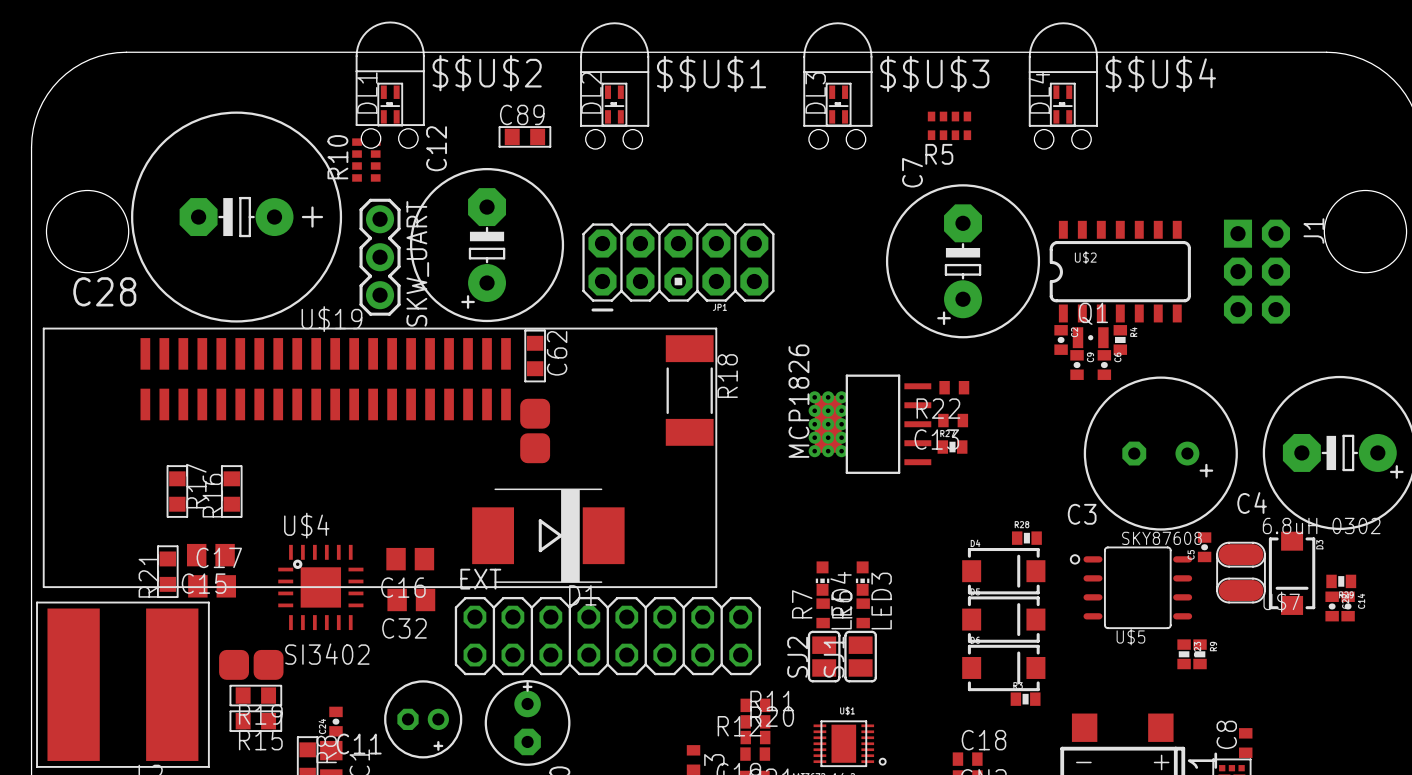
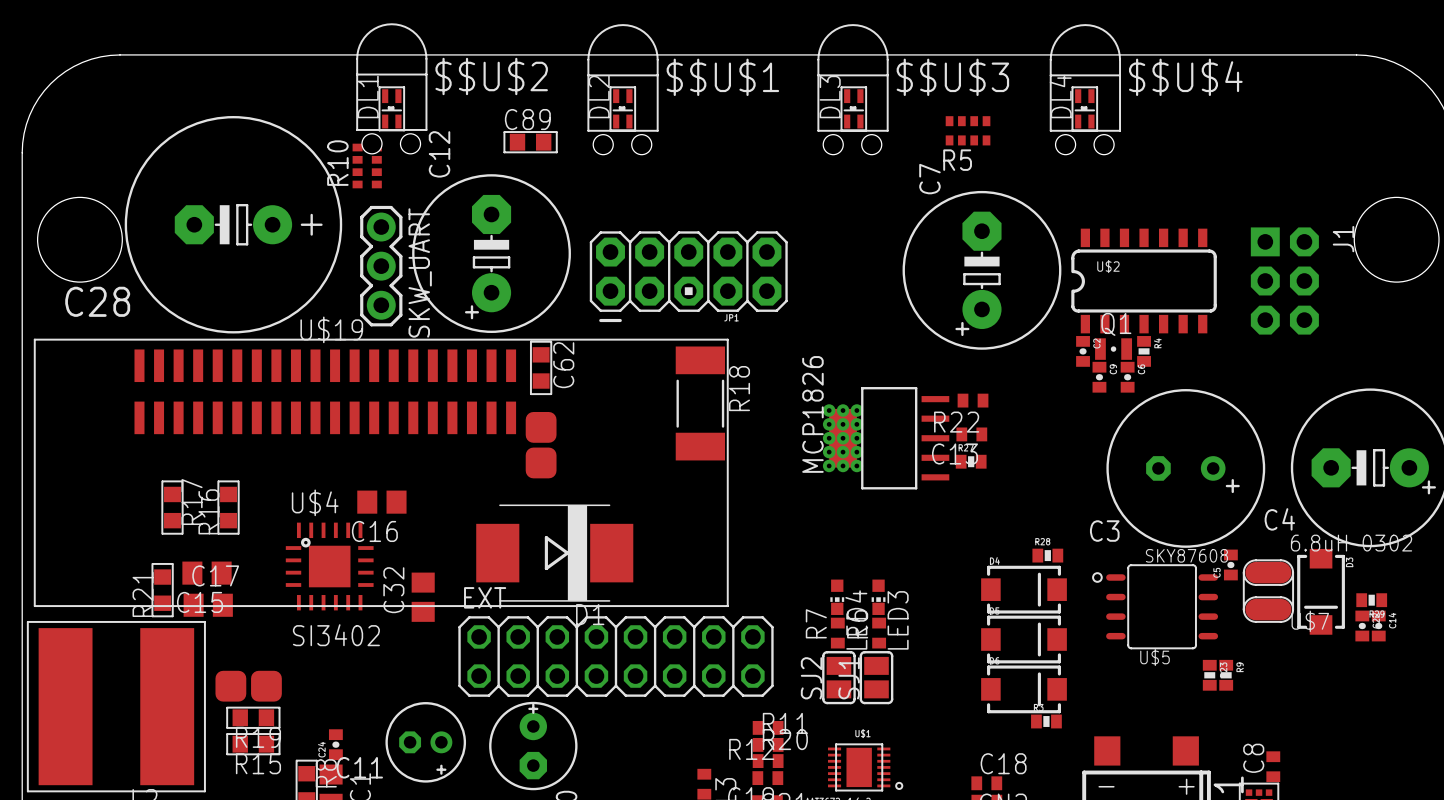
C16 position: (410, 559) -> (381, 502)
U$4 position: (320, 587) -> (329, 566)
C32 rotation: 0° (411, 599) -> 90° clockwise (423, 597)

